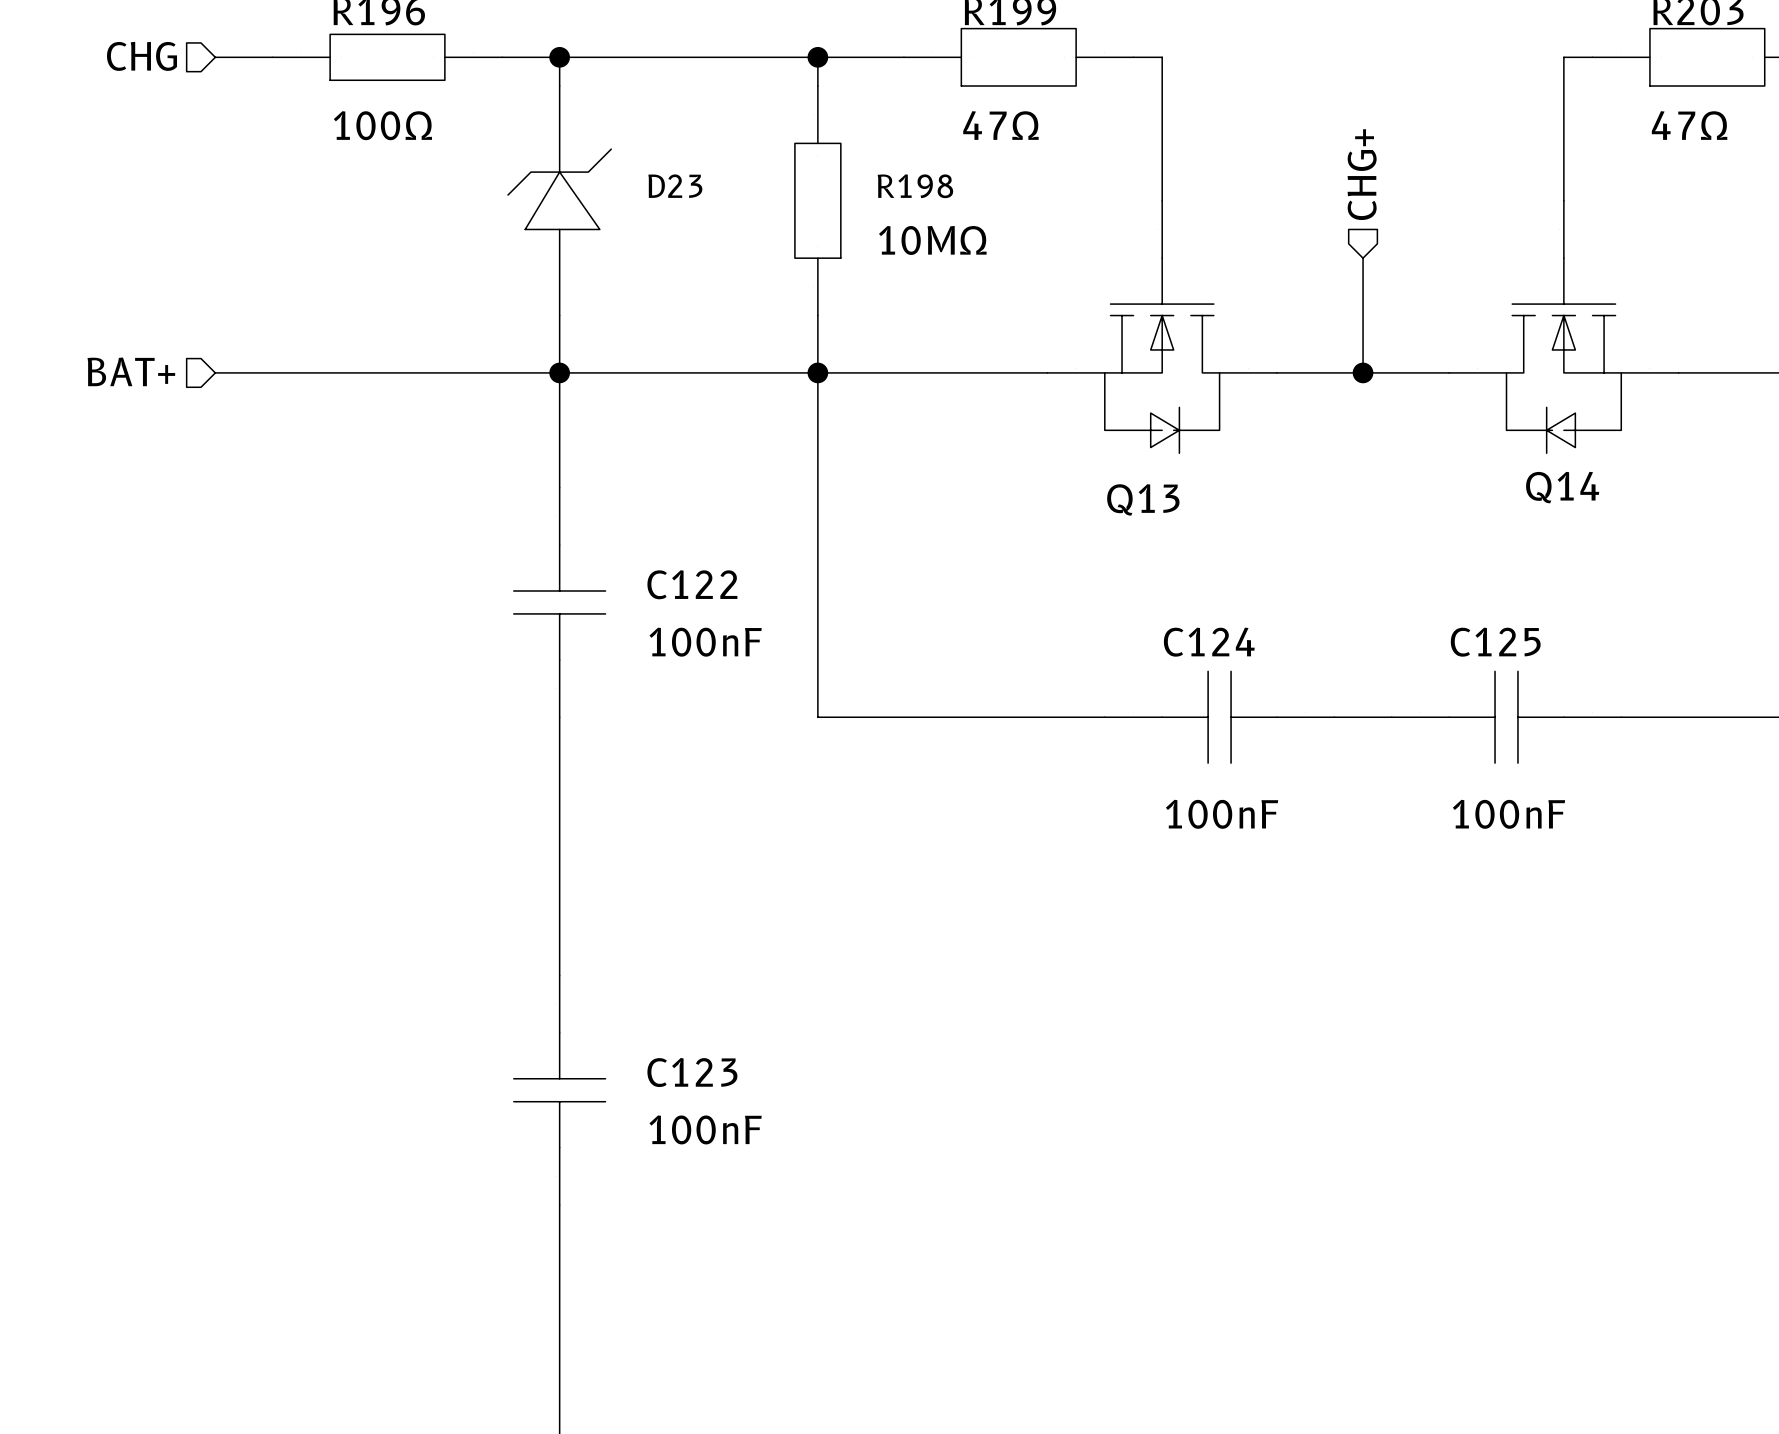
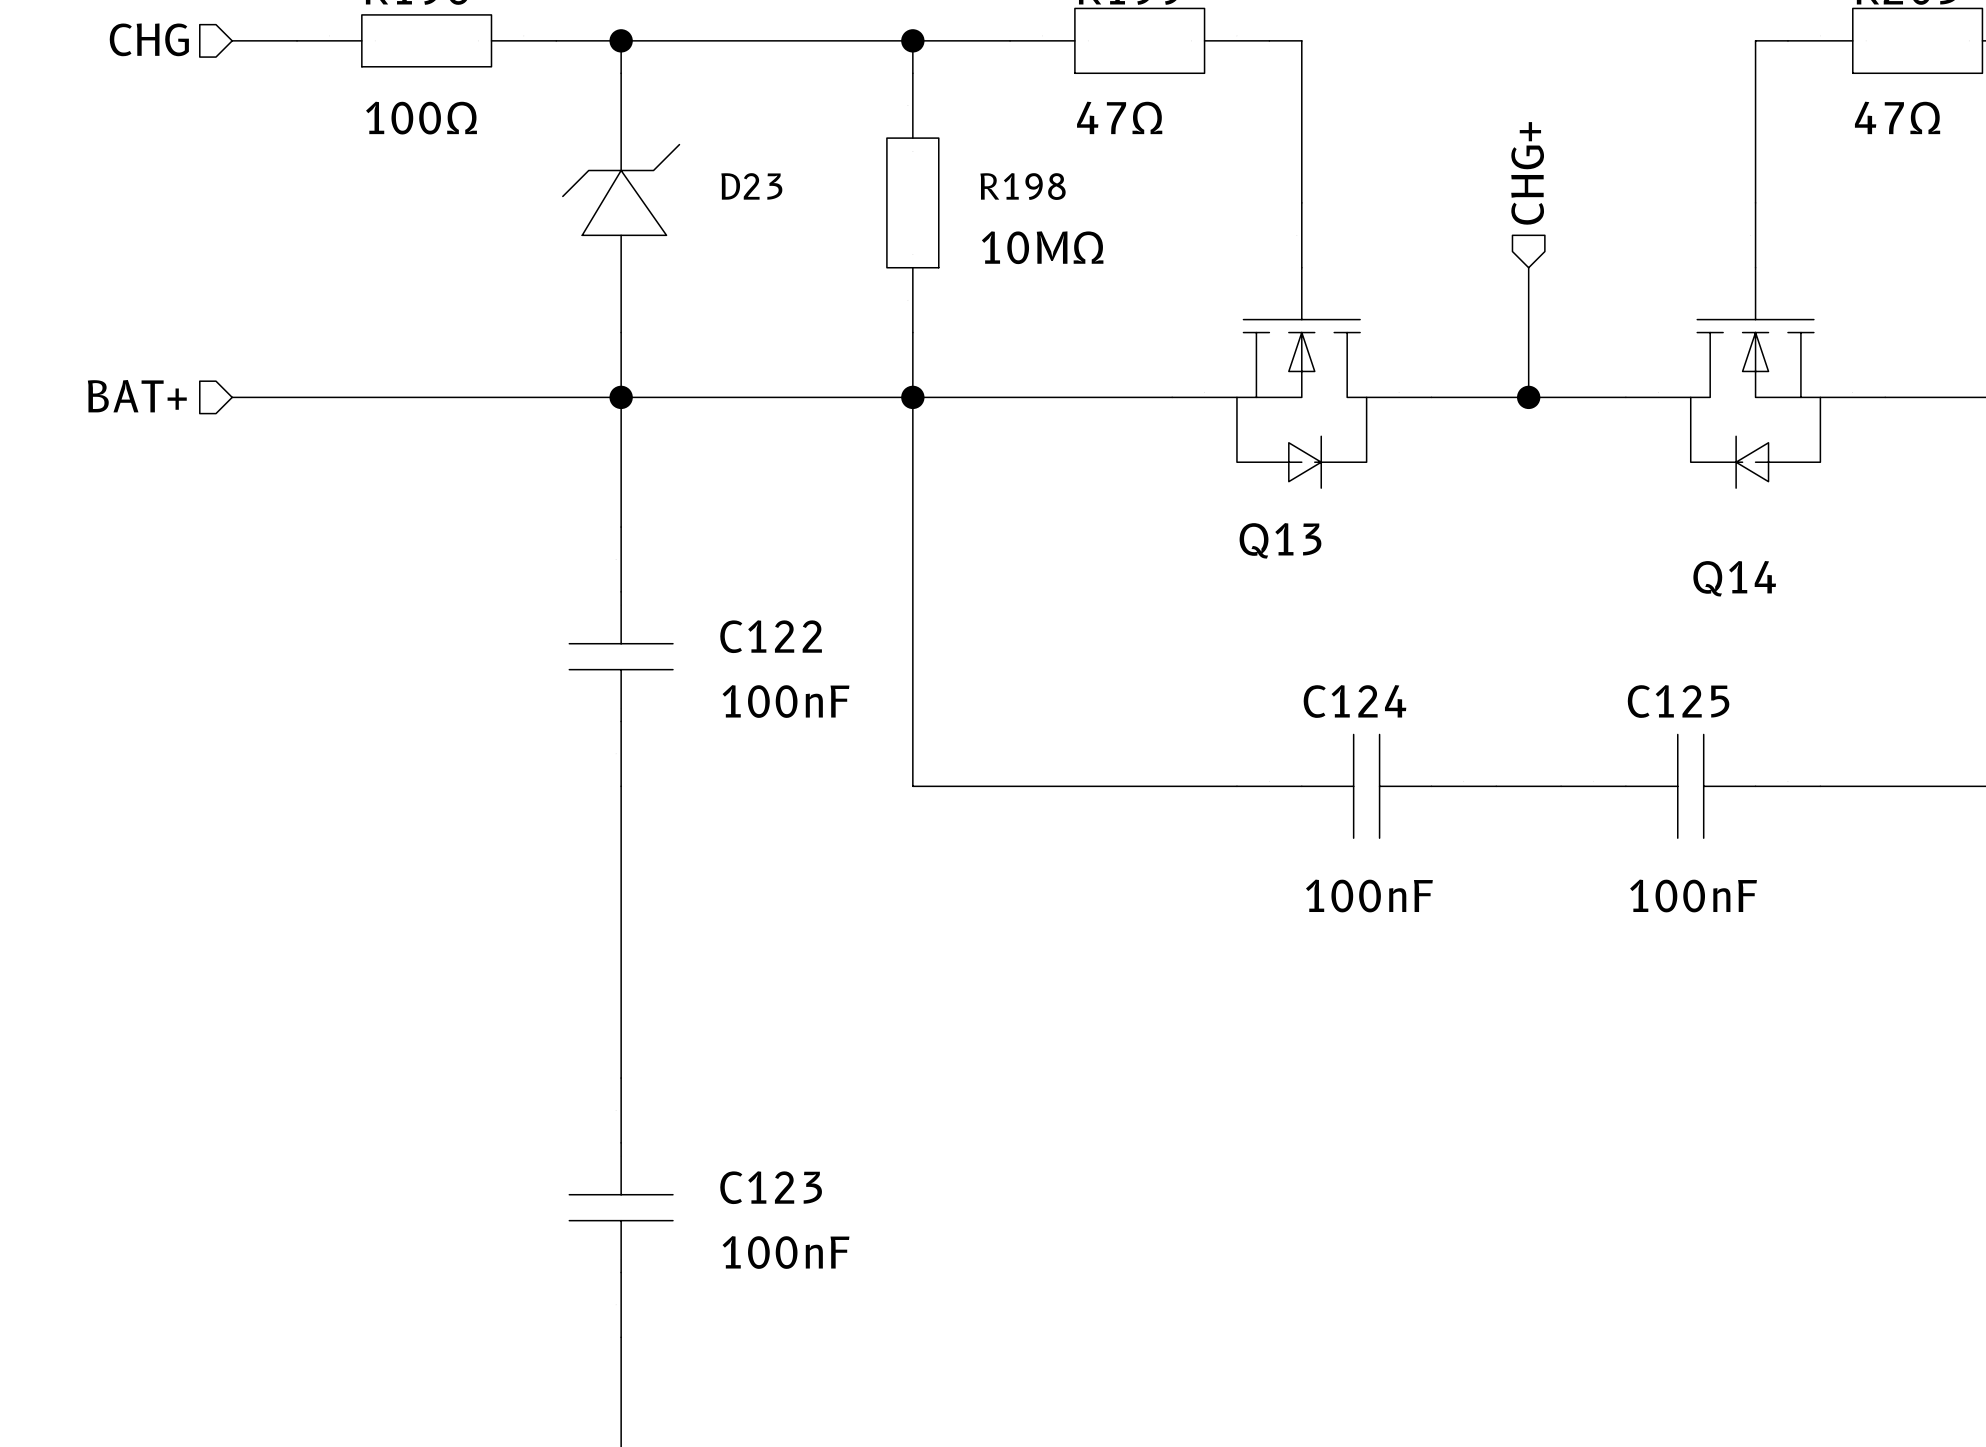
Q14 name position: Q14 (1562, 487) -> Q14 (1734, 578)

